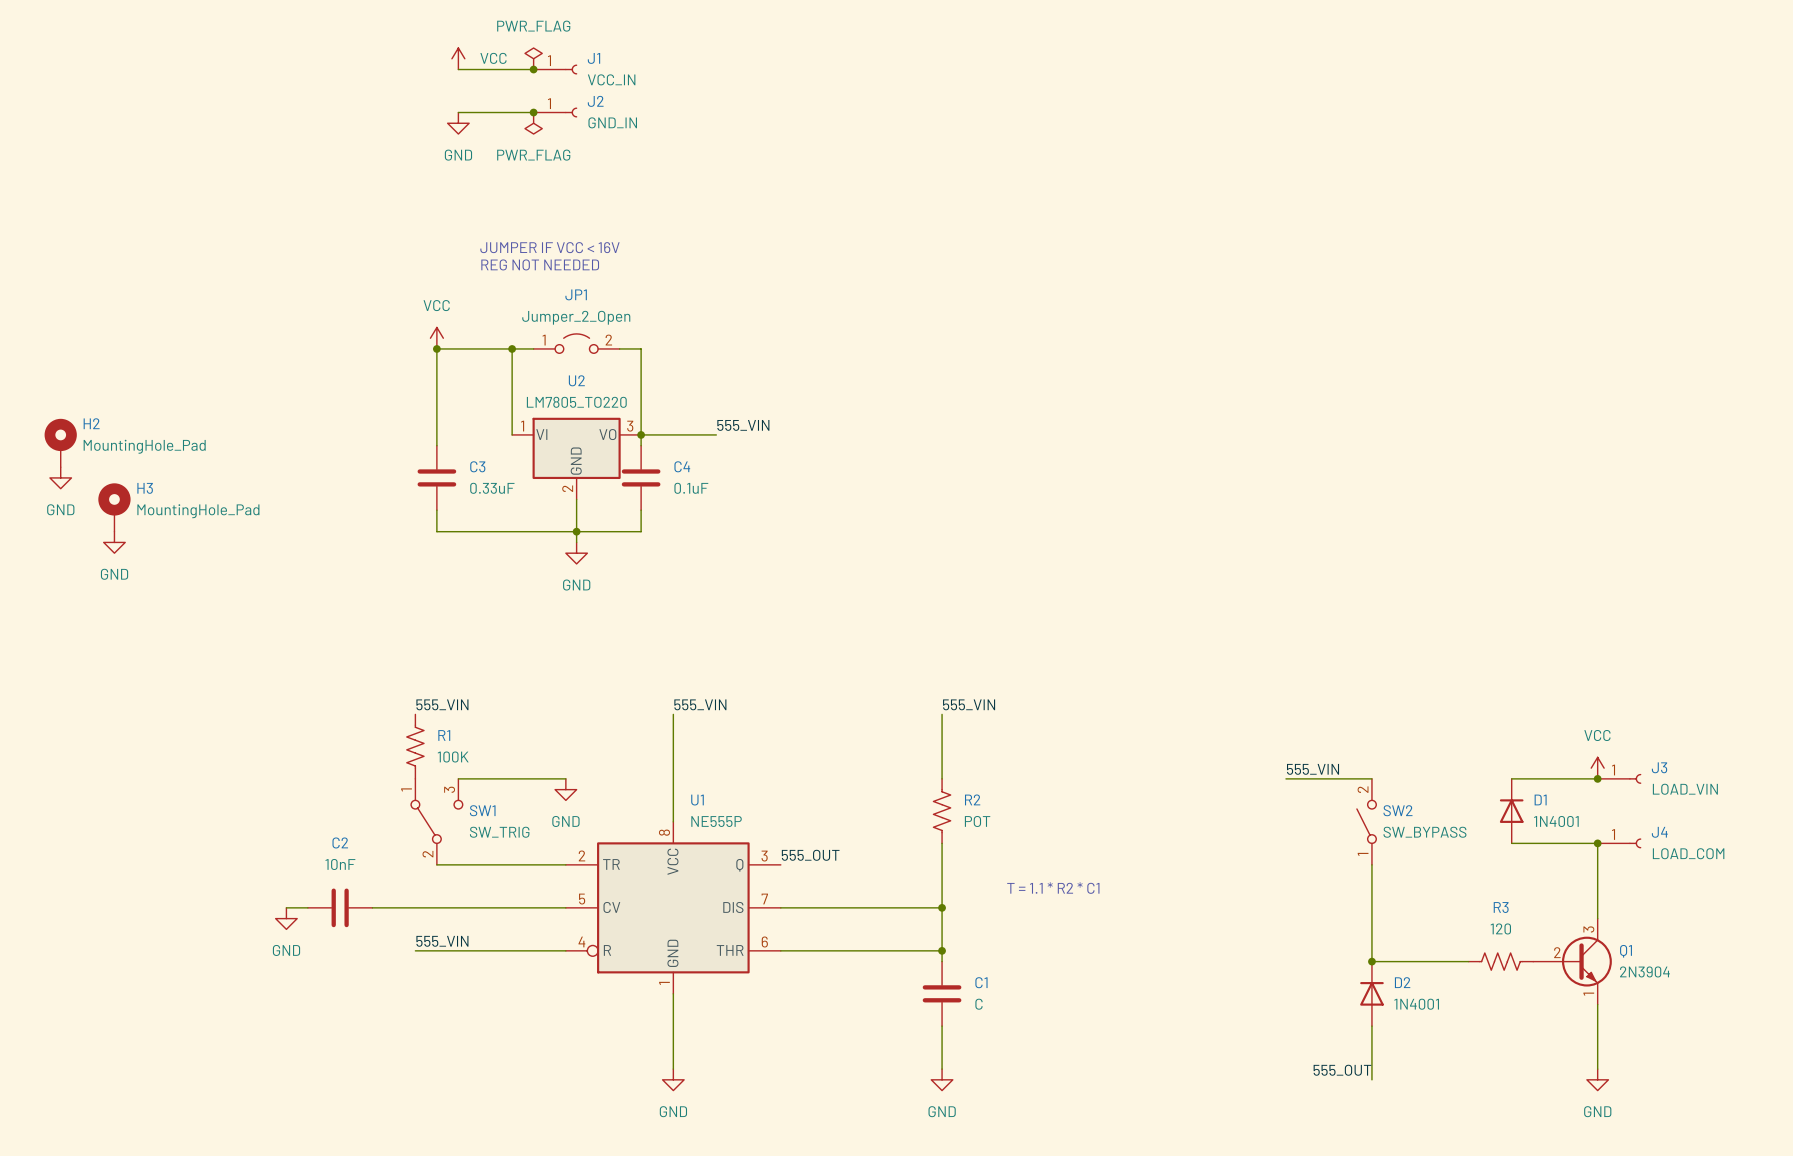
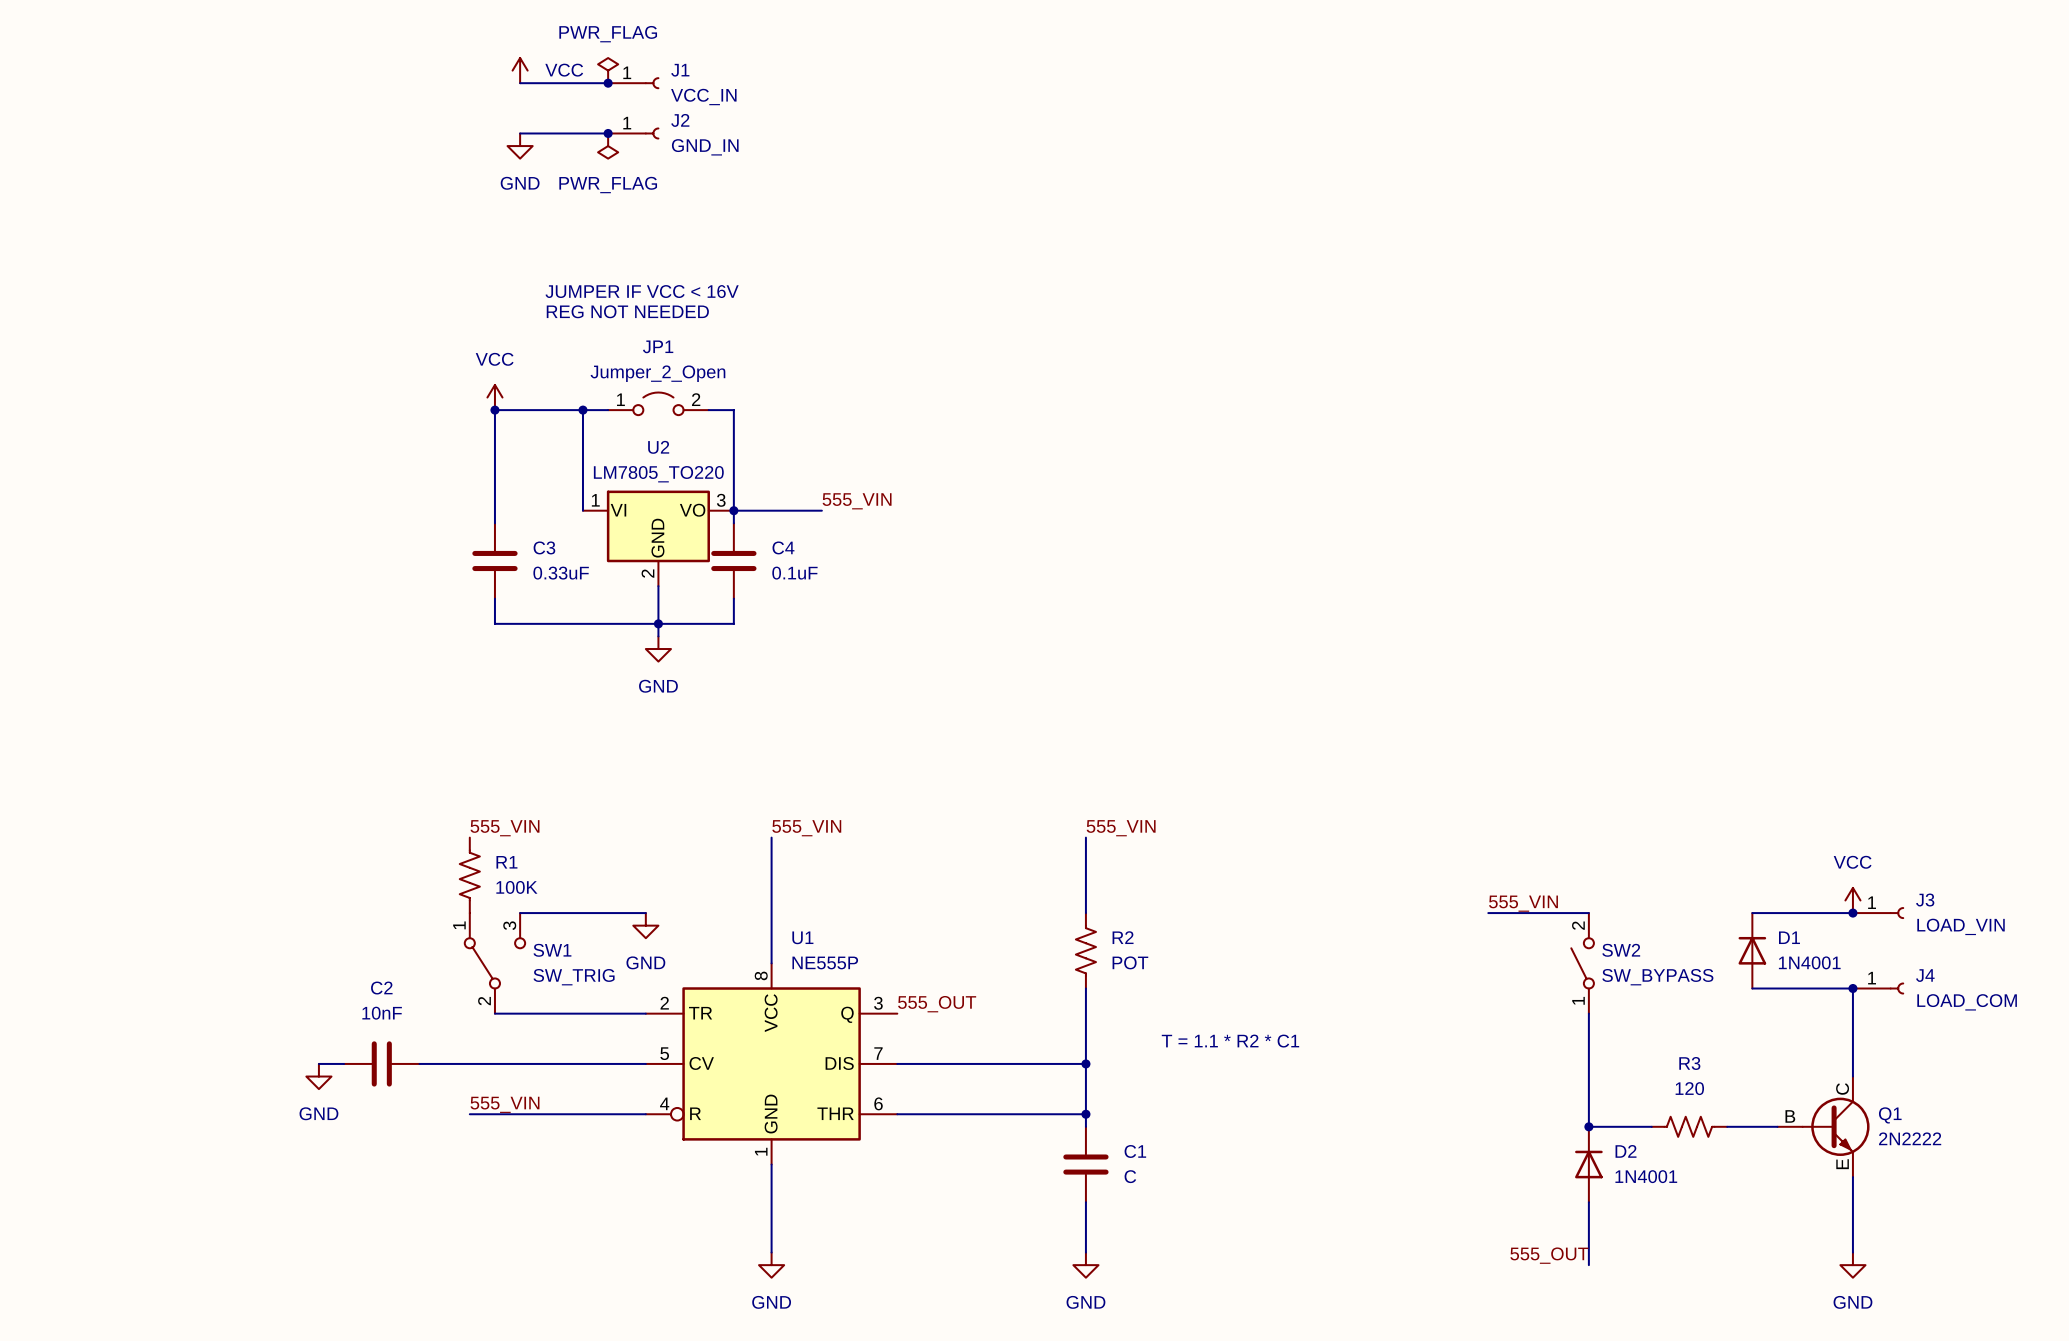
H2: MountingHole_Pad (60, 443) -> none
power symbol: GND (60, 477) -> none
H3: MountingHole_Pad (114, 507) -> none
power symbol: GND (114, 542) -> none
Q1 symbol: [1533, 918, 1612, 1005] -> [1777, 1076, 1870, 1178]
wire: (1425, 961) (1468, 961) -> (1727, 1126) (1777, 1126)
R3 position: (1500, 961) -> (1689, 1126)
Q1 value: 2N3904 (1644, 971) -> 2N2222 (1910, 1138)

